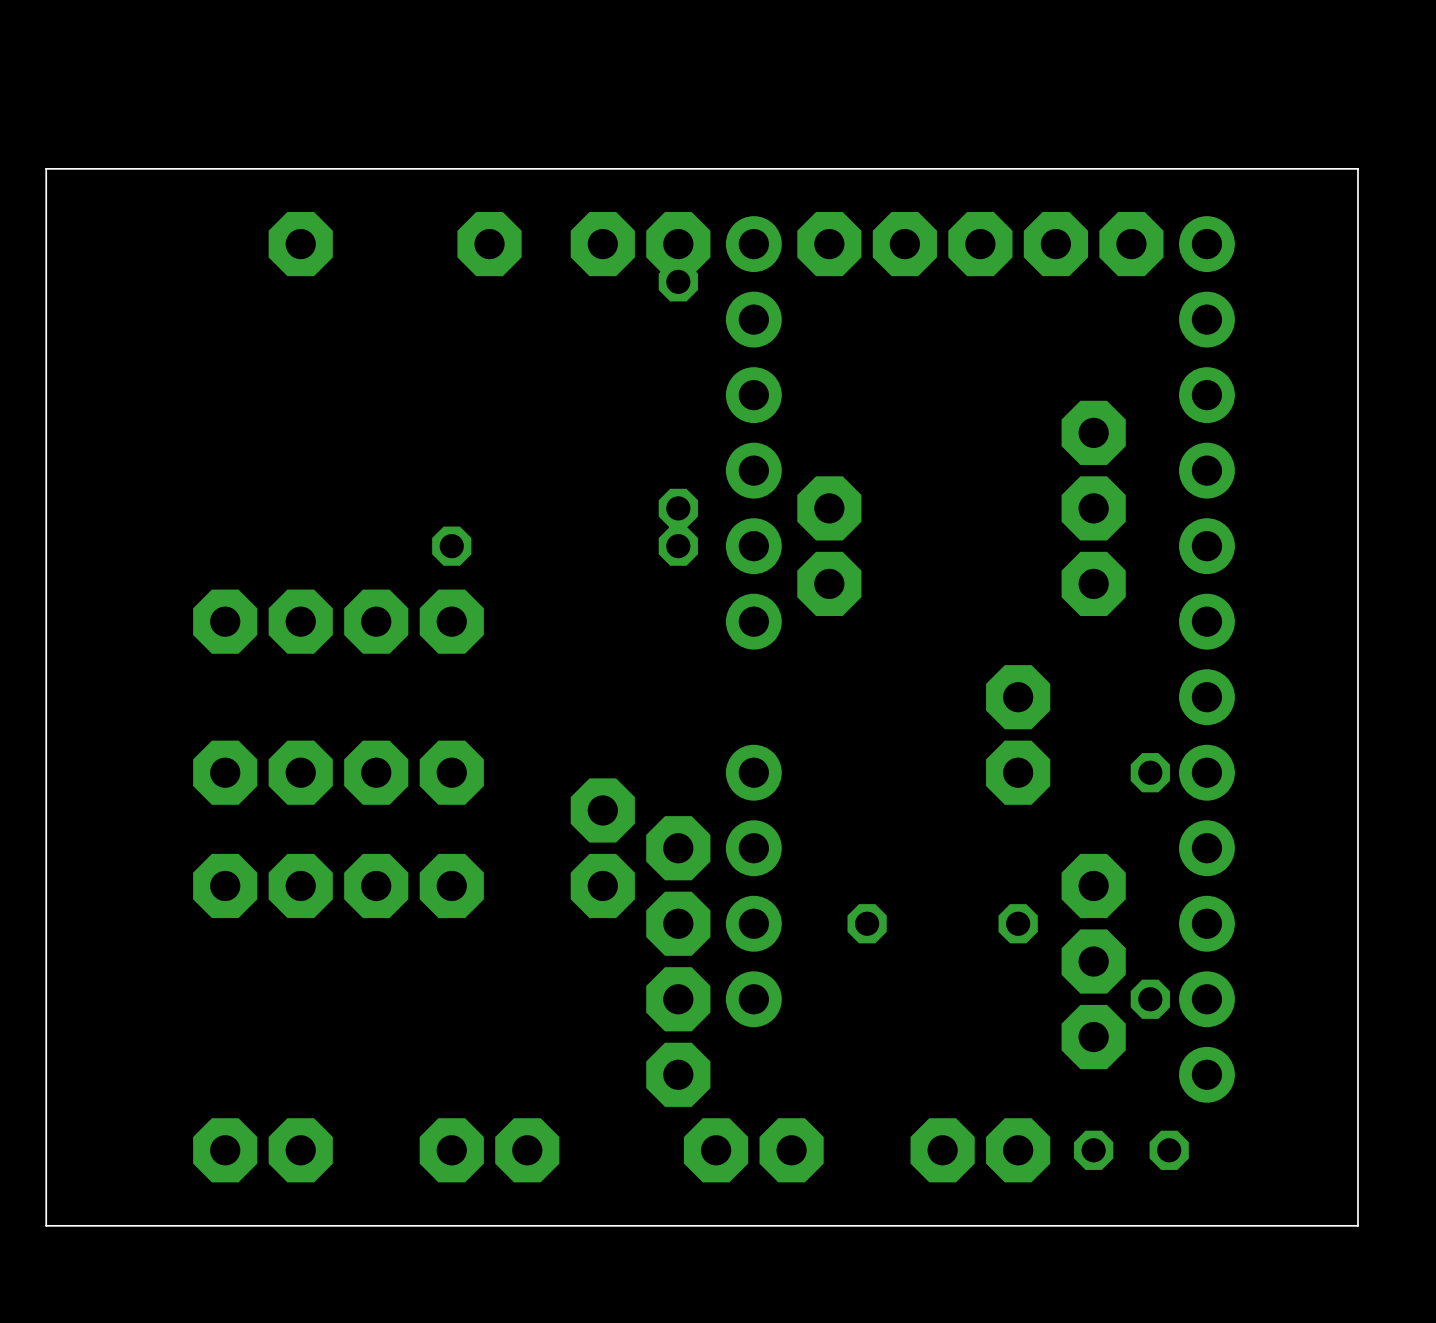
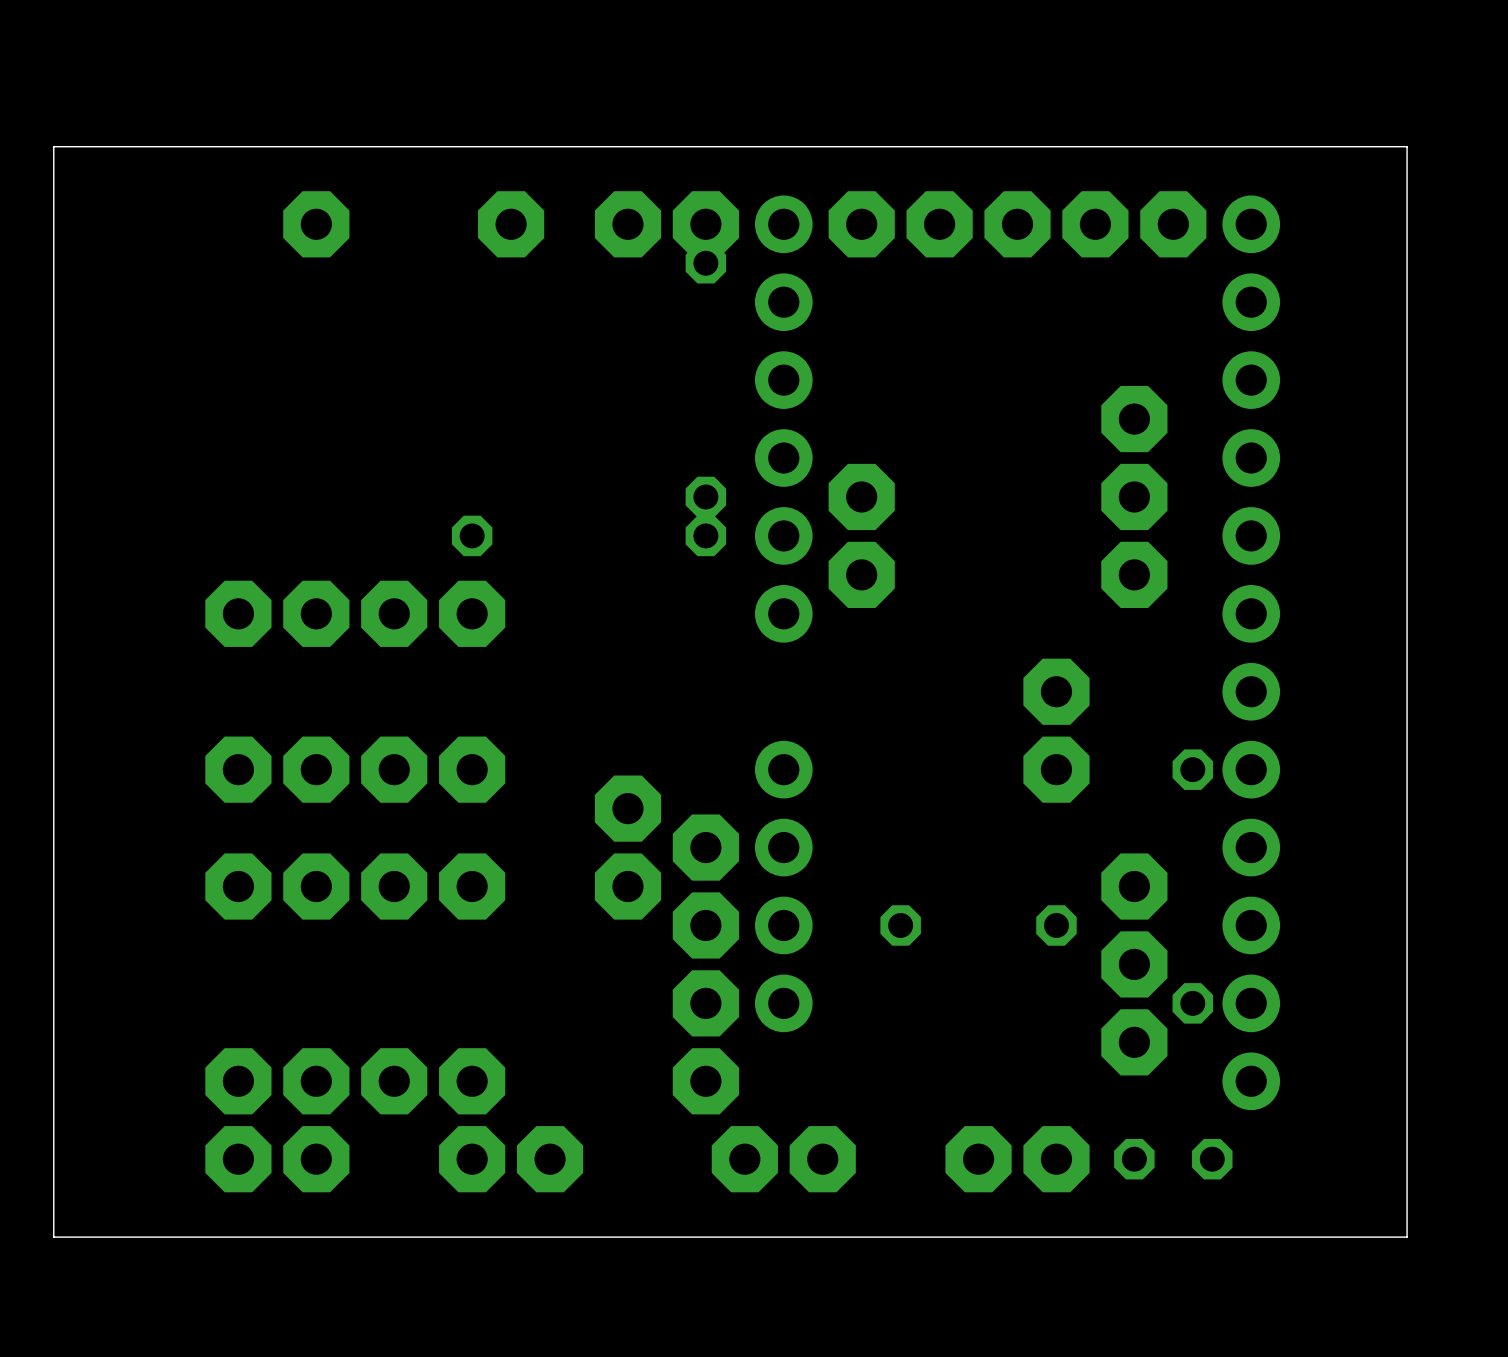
part: none -> (238, 1081)
part: none -> (316, 1081)
part: none -> (394, 1081)
part: none -> (472, 1081)

